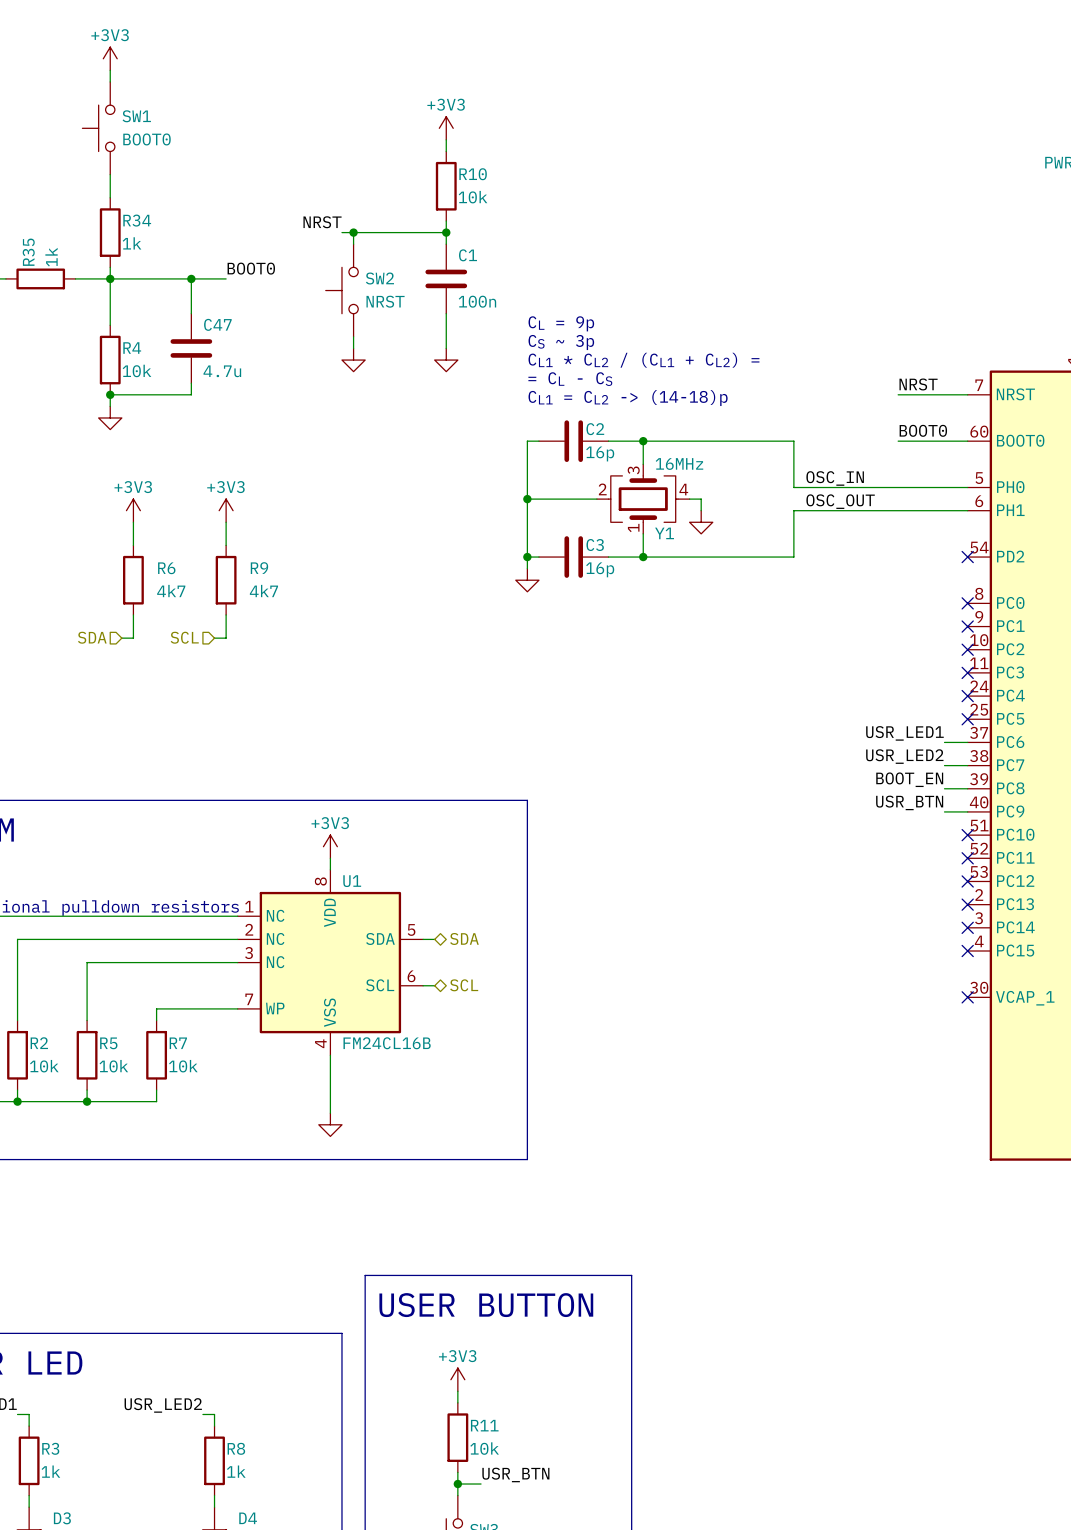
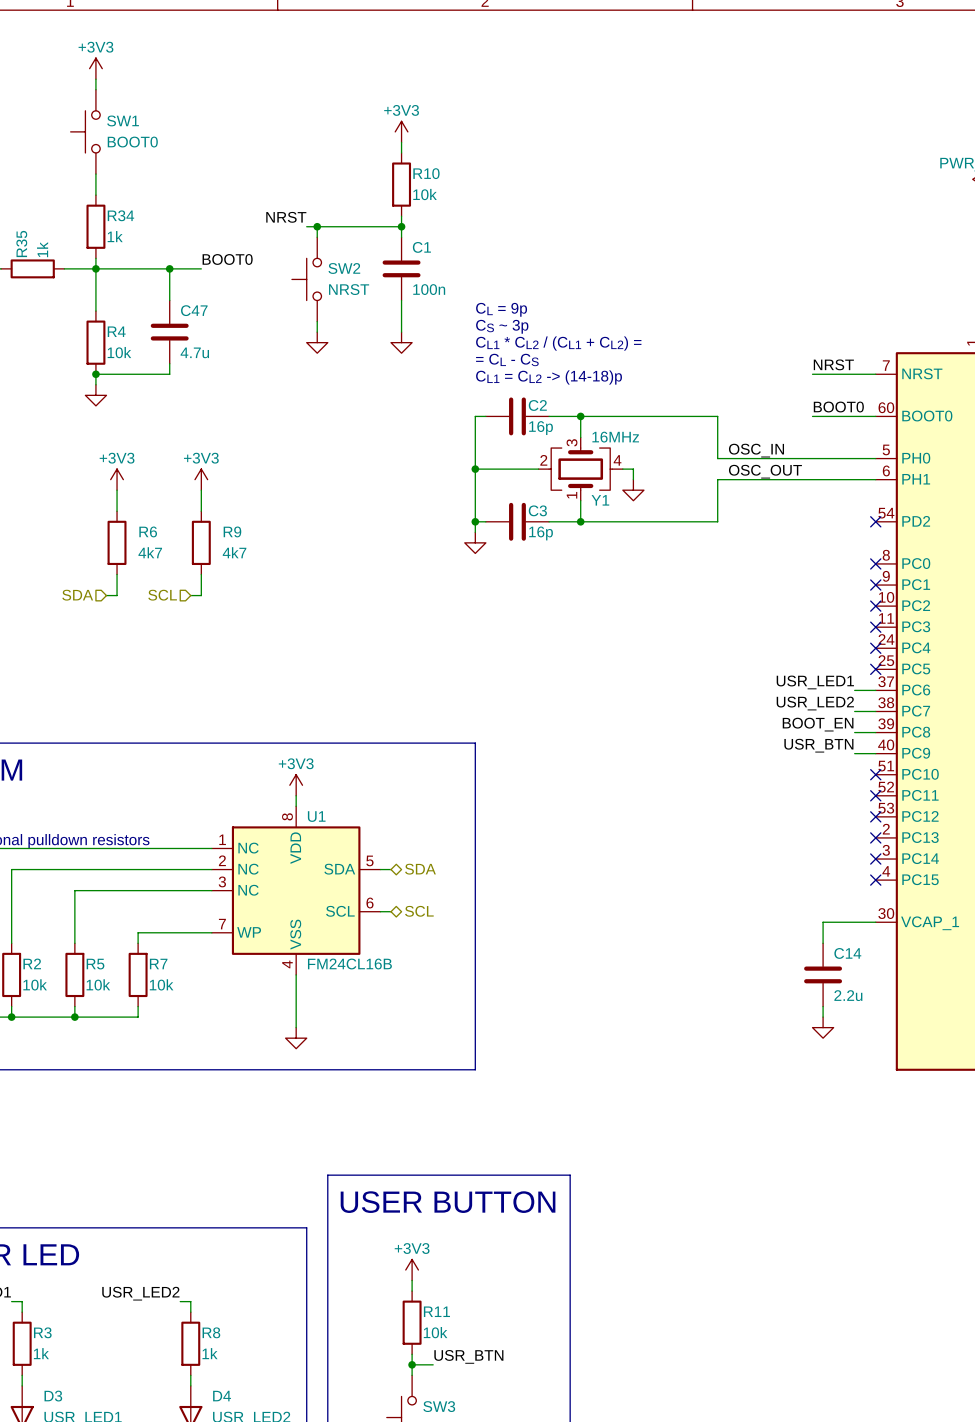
wire: none -> (875, 922) (823, 922) (823, 943)
no-connect mark: (967, 997) -> none
C14: none -> 2.2u (823, 974)
wire: none -> (823, 1006) (823, 1017)
power symbol: none -> (823, 1027)

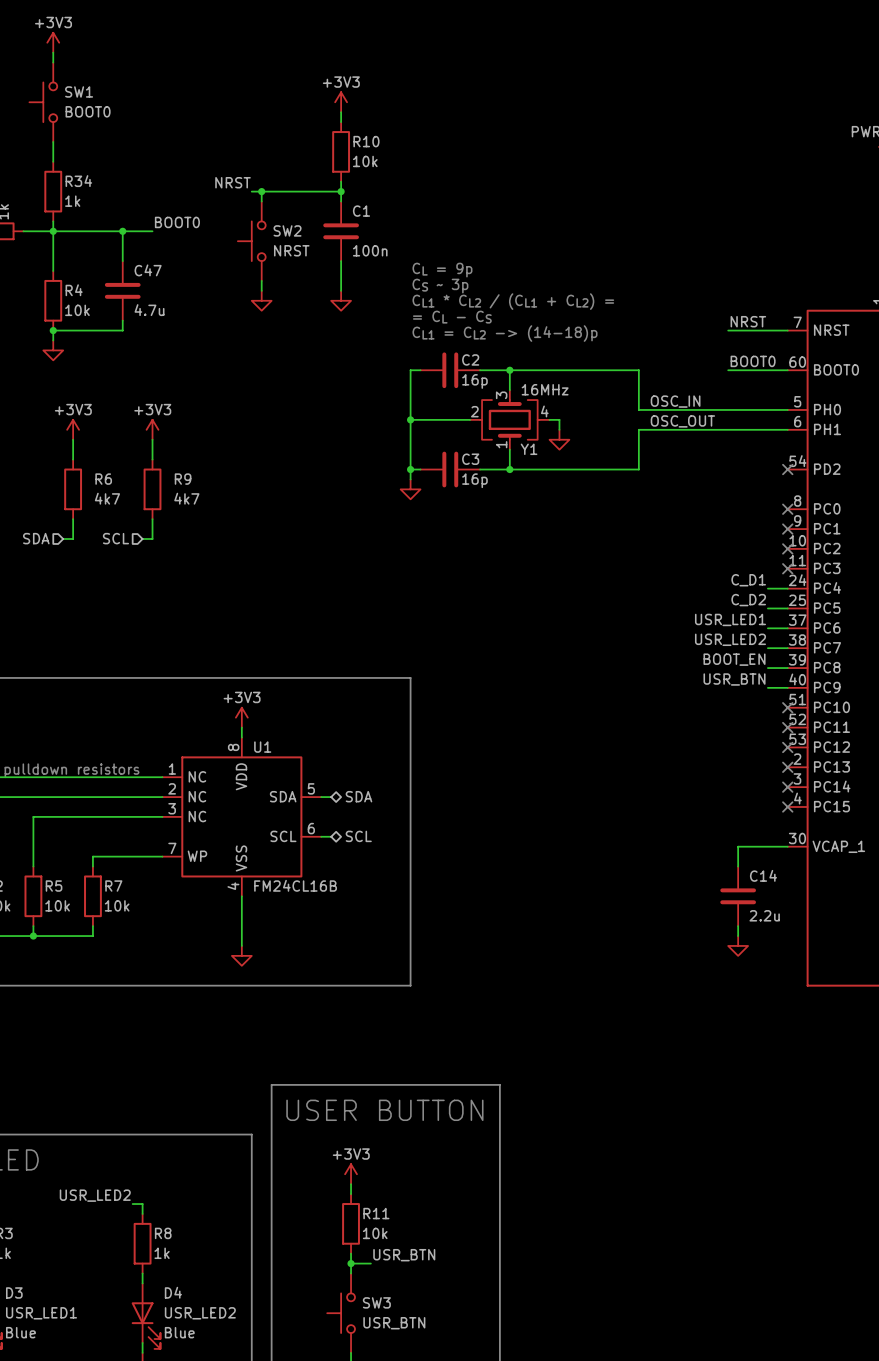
label: none -> C_D1 (748, 580)
wire: none -> (767, 588) (787, 588)
no-connect mark: (875, 648) -> none
label: none -> C_D2 (748, 600)
wire: none -> (767, 608) (787, 608)
no-connect mark: (875, 669) -> none

